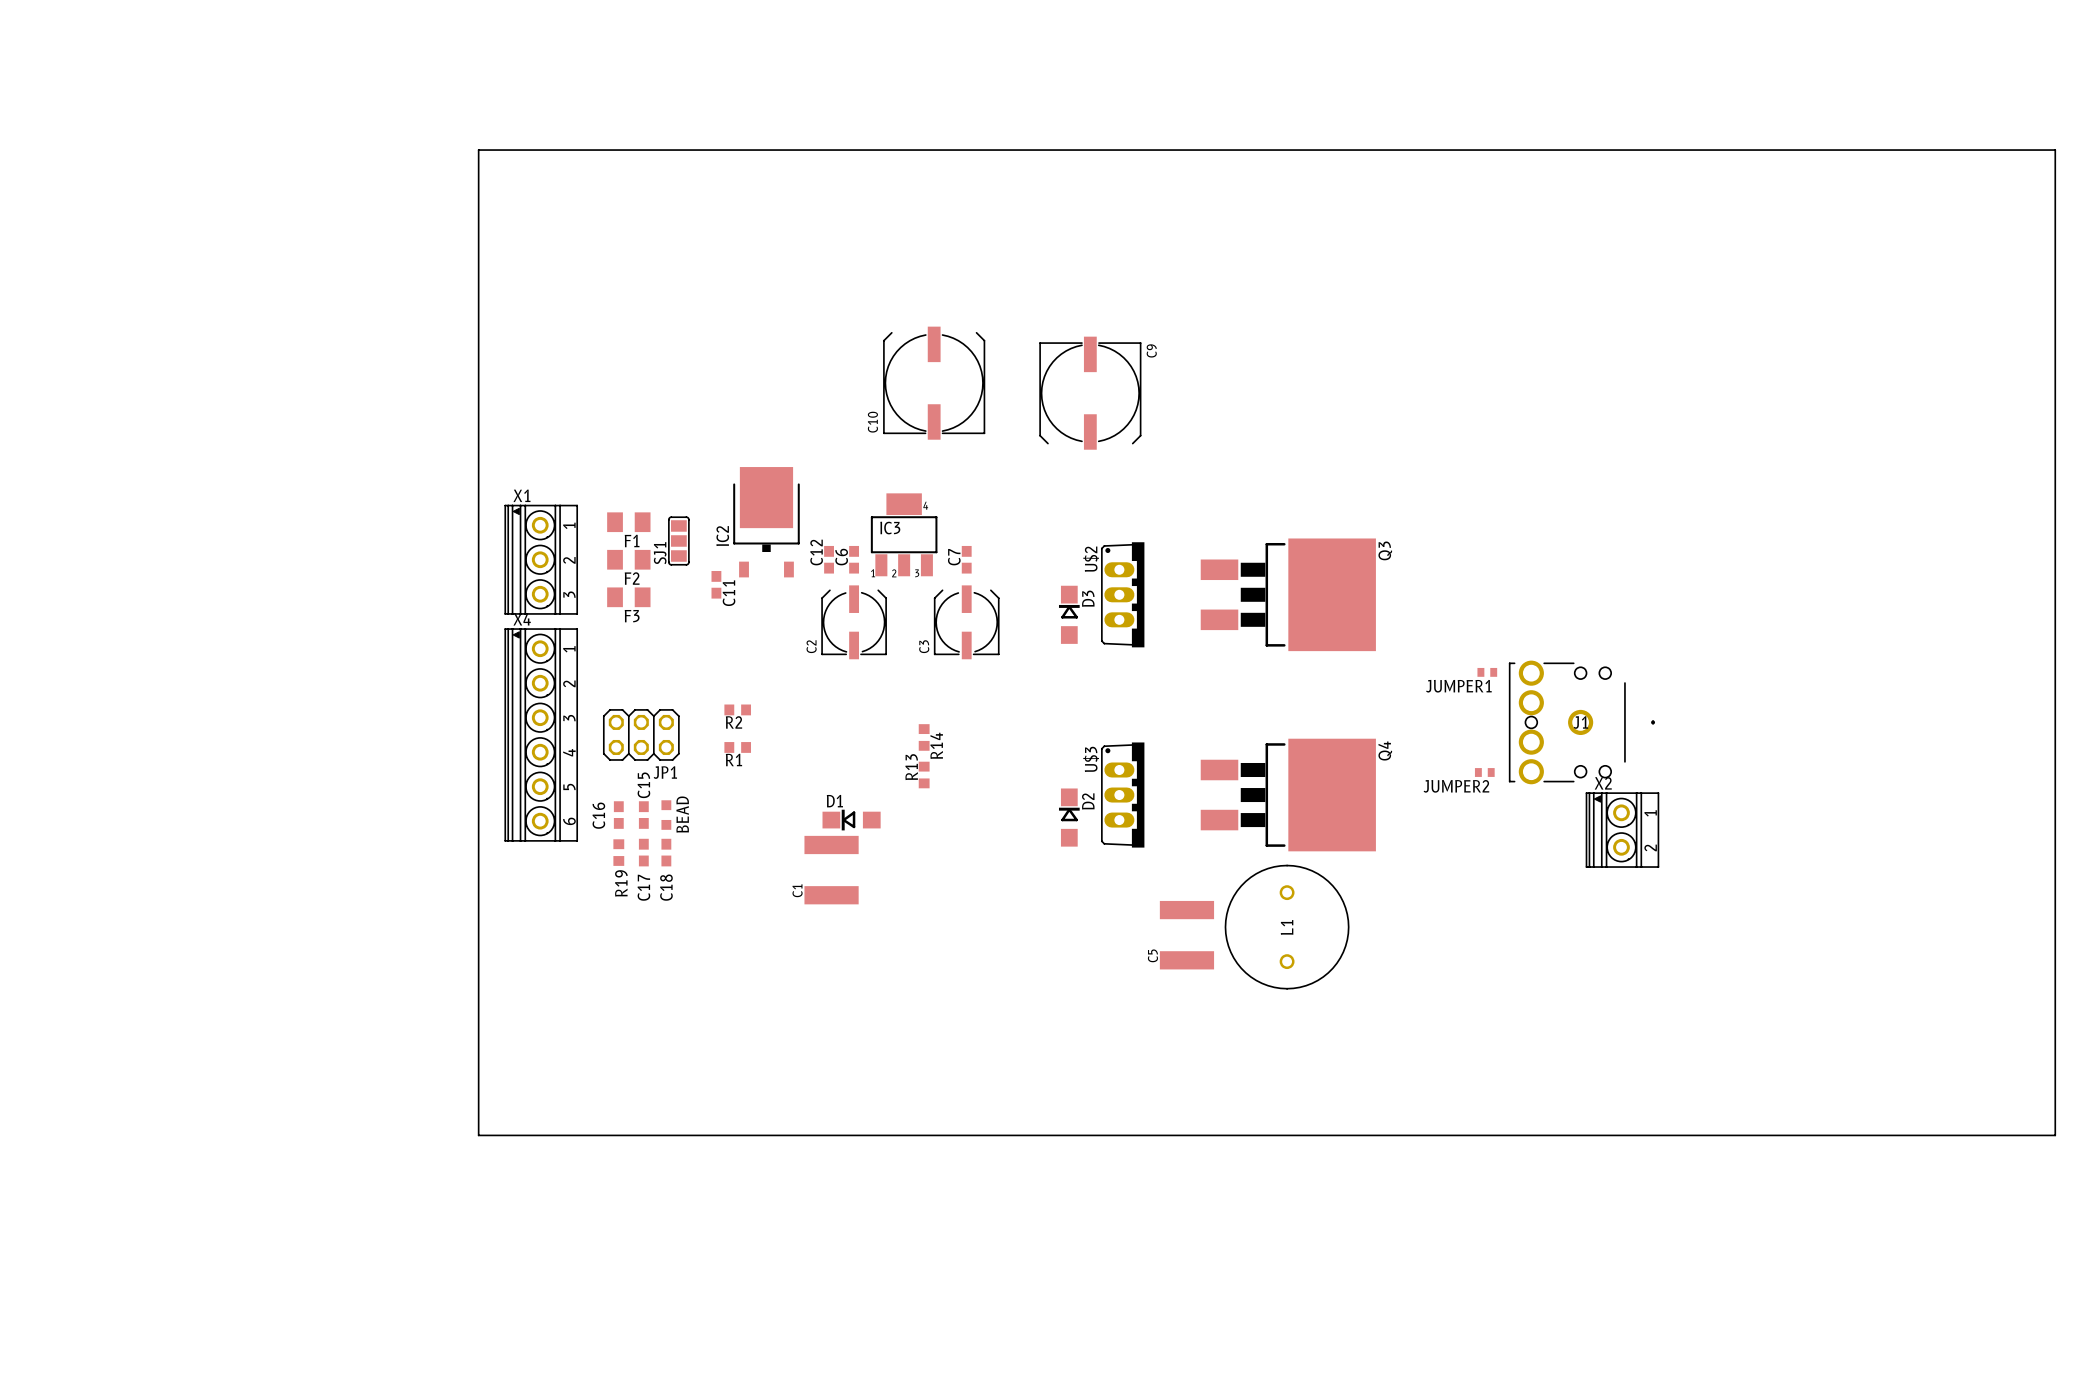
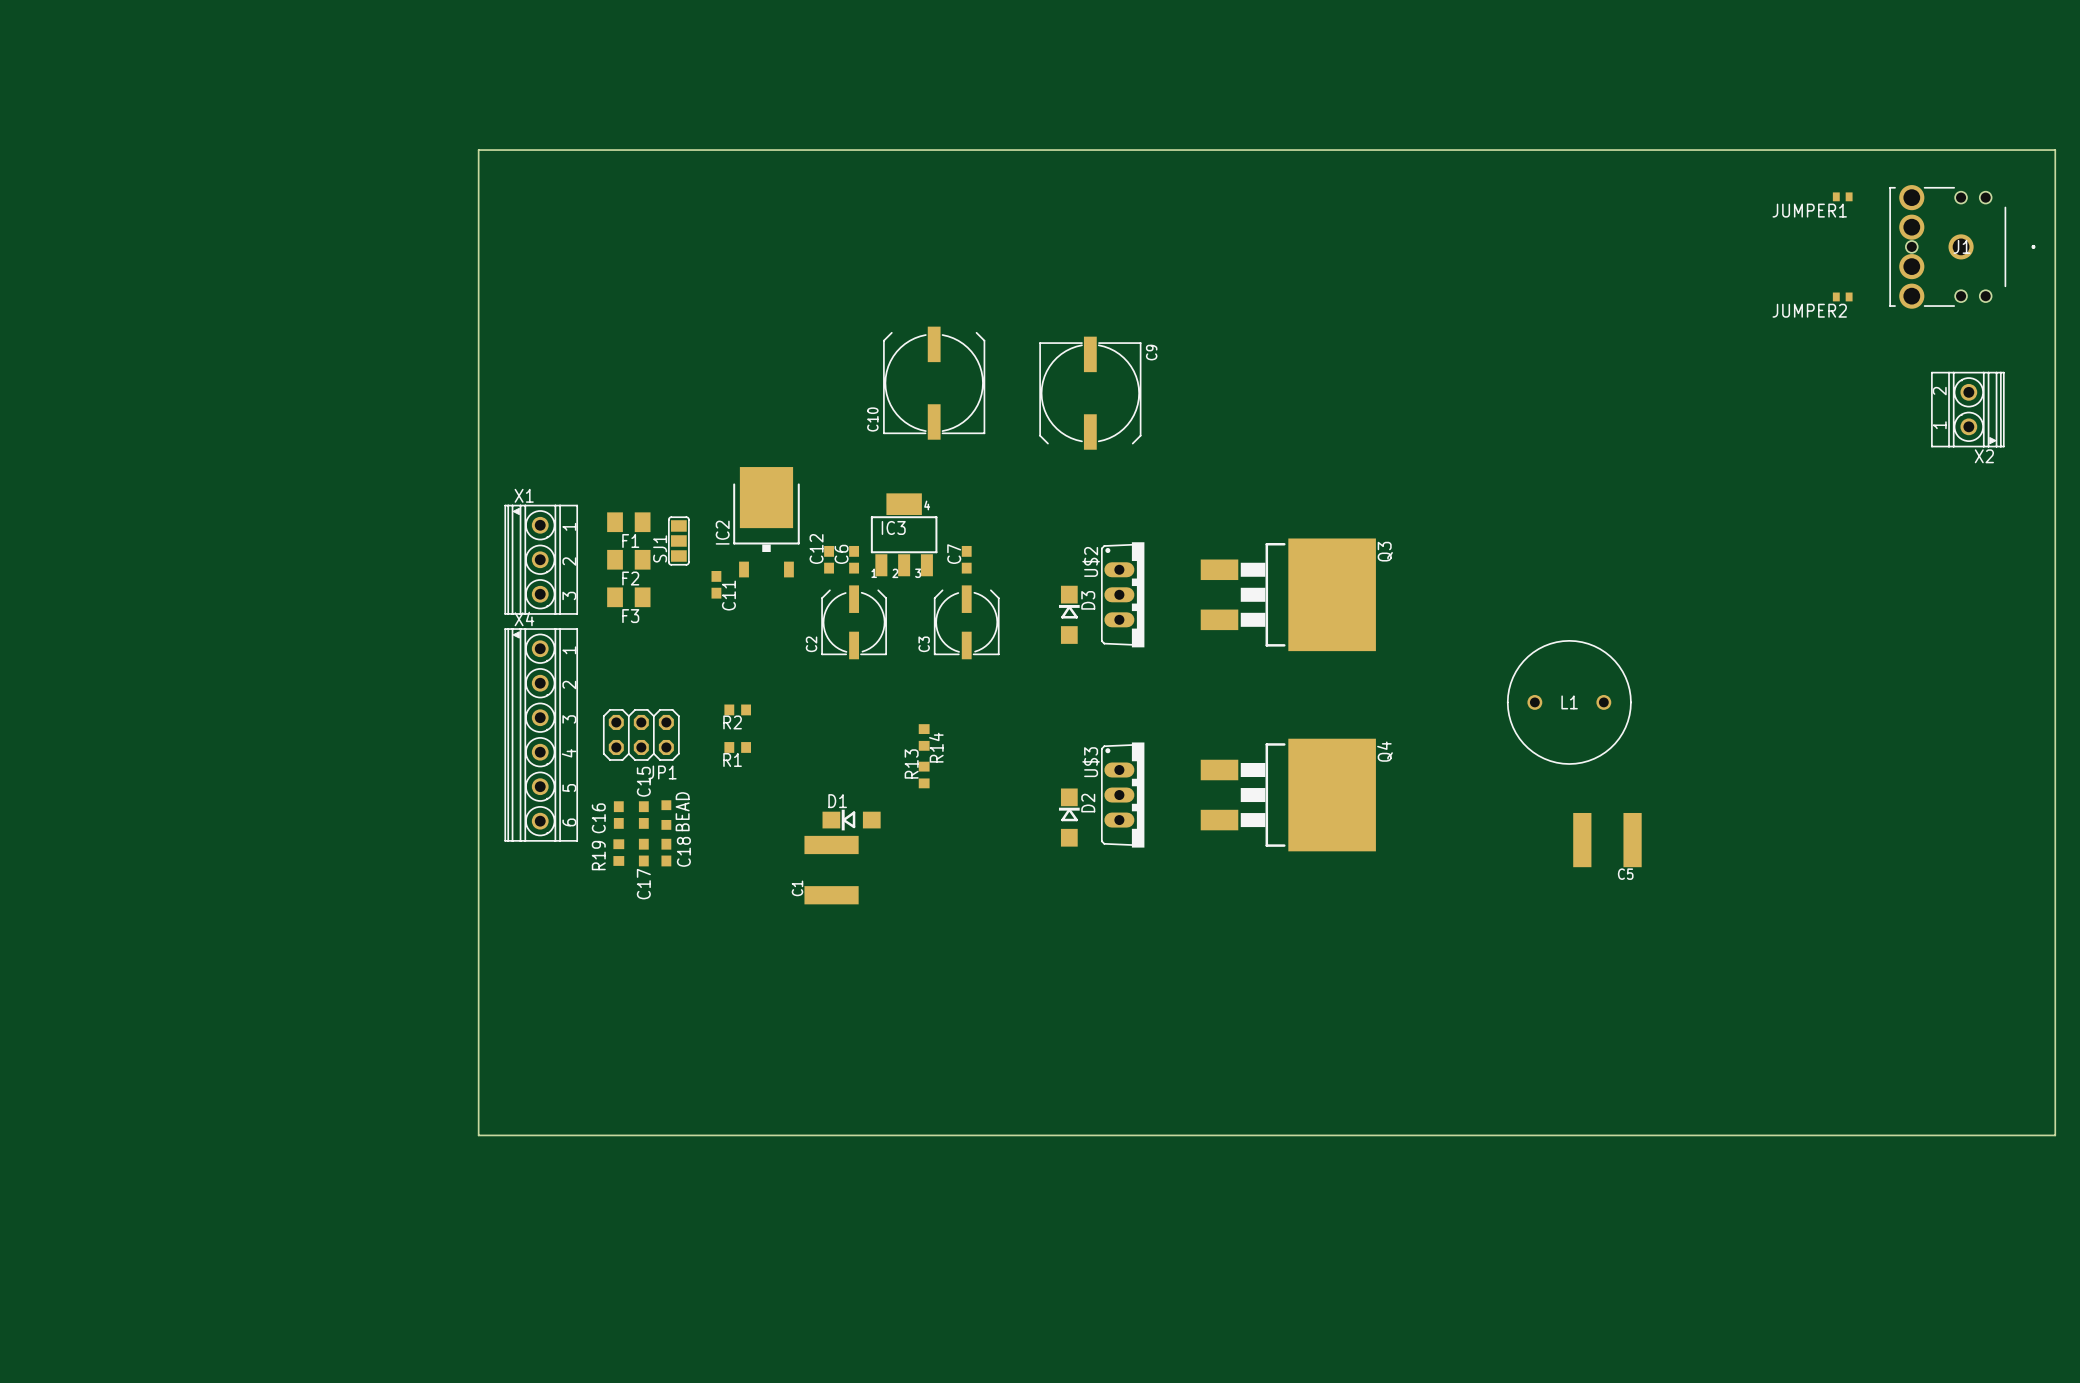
JUMPER1 position: (1487, 672) -> (1842, 196)
J1 position: (1582, 722) -> (1962, 246)
JUMPER2 position: (1484, 772) -> (1842, 296)
X2 name position: X2 (1603, 783) -> X2 (1984, 456)
X2 footprint: [1586, 792, 1659, 868] -> [1931, 372, 2005, 448]
R19 name position: R19 (621, 883) -> R19 (598, 855)
C18 name position: C18 (666, 887) -> C18 (683, 851)
L1 rotation: 0° (1287, 927) -> 90° clockwise (1569, 702)
L1 position: (1287, 927) -> (1569, 702)
C5 rotation: 0° (1186, 935) -> 90° clockwise (1607, 840)
C5 position: (1186, 935) -> (1607, 840)
C5 name position: C5 (1152, 955) -> C5 (1625, 874)

